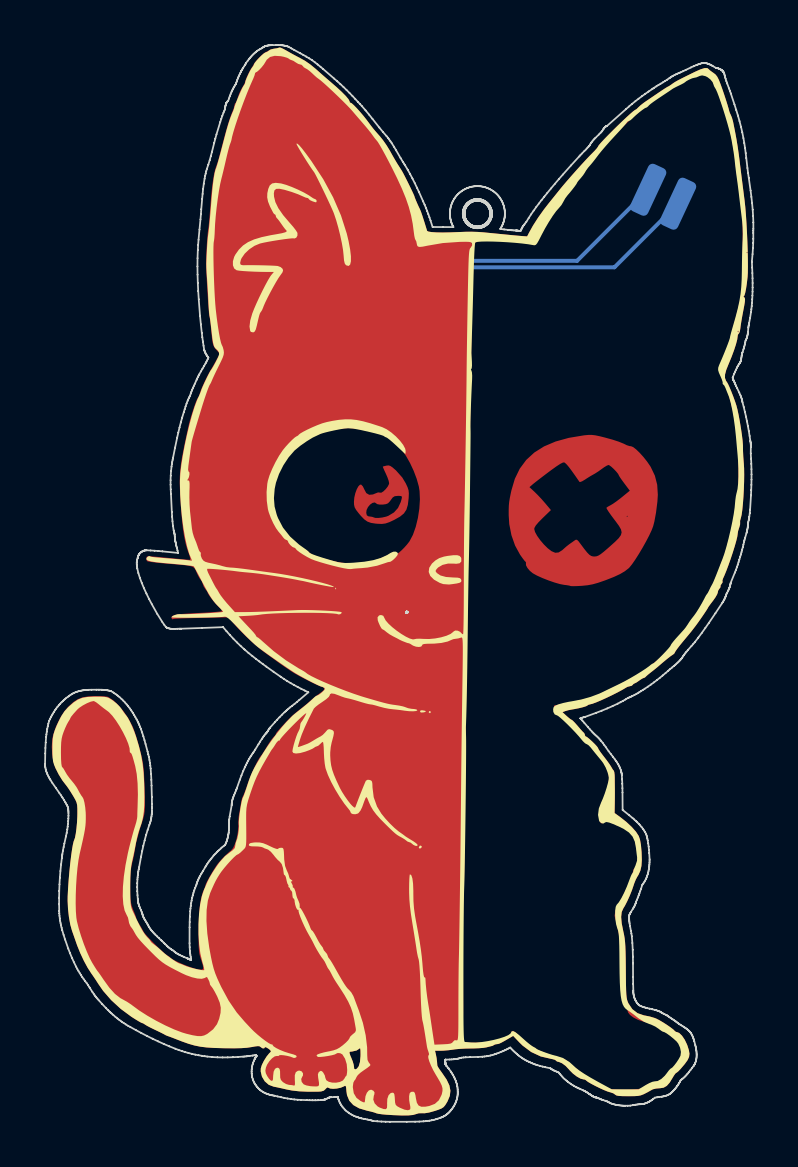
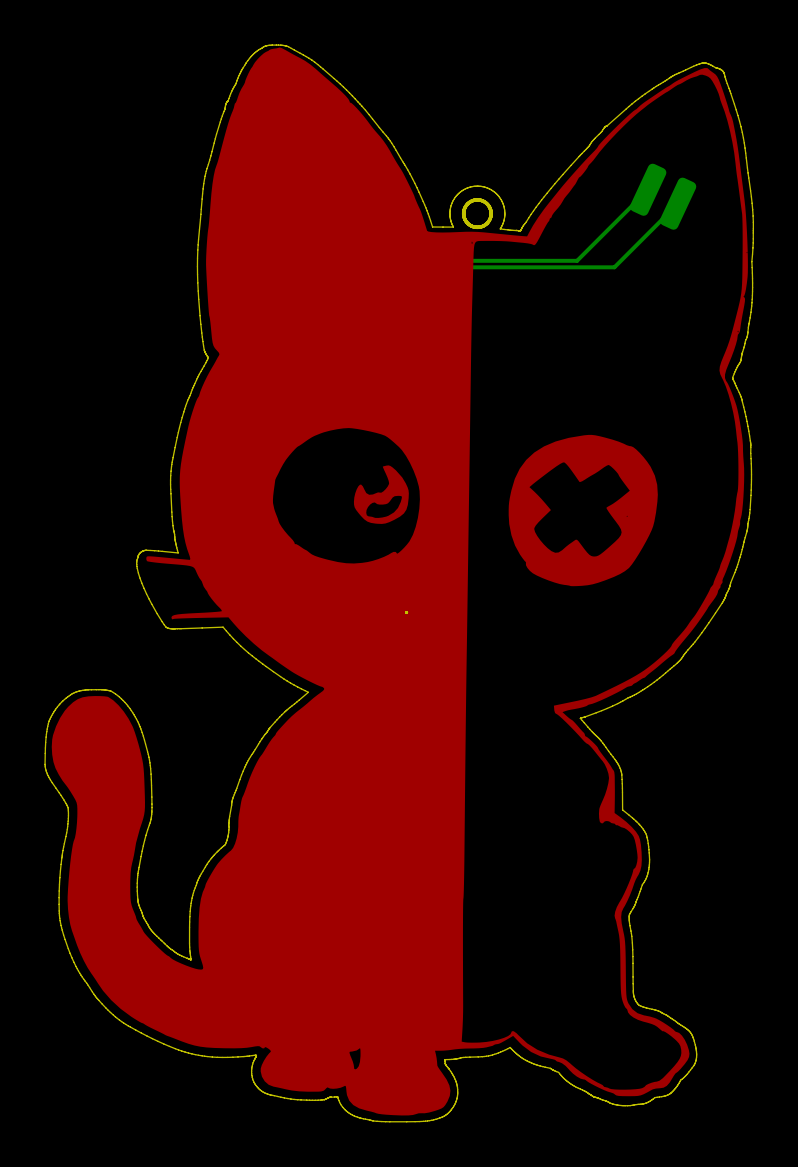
drawing shape: [51, 47, 748, 1116] -> [51, 47, 748, 1116]

